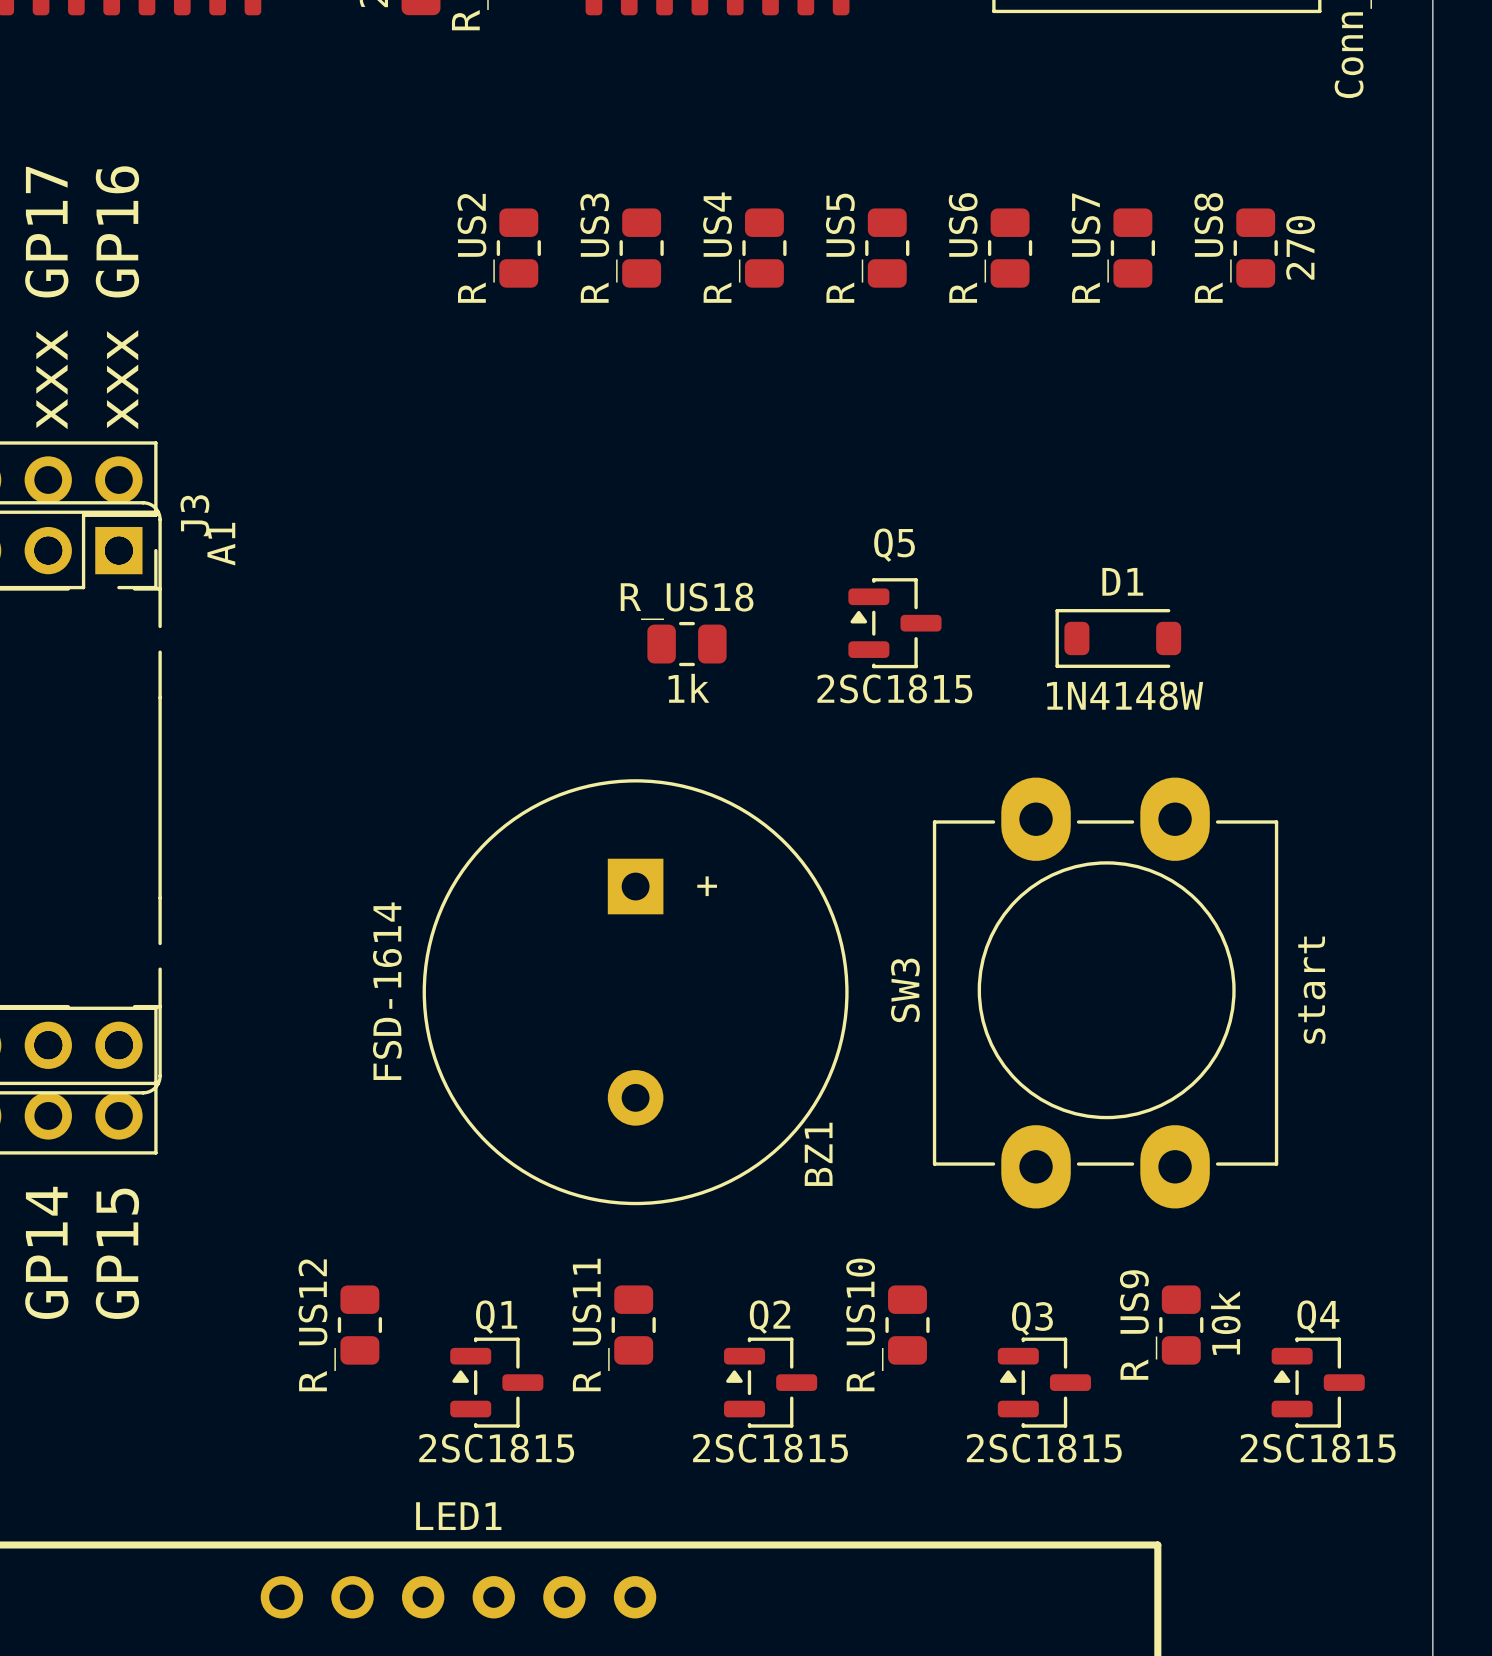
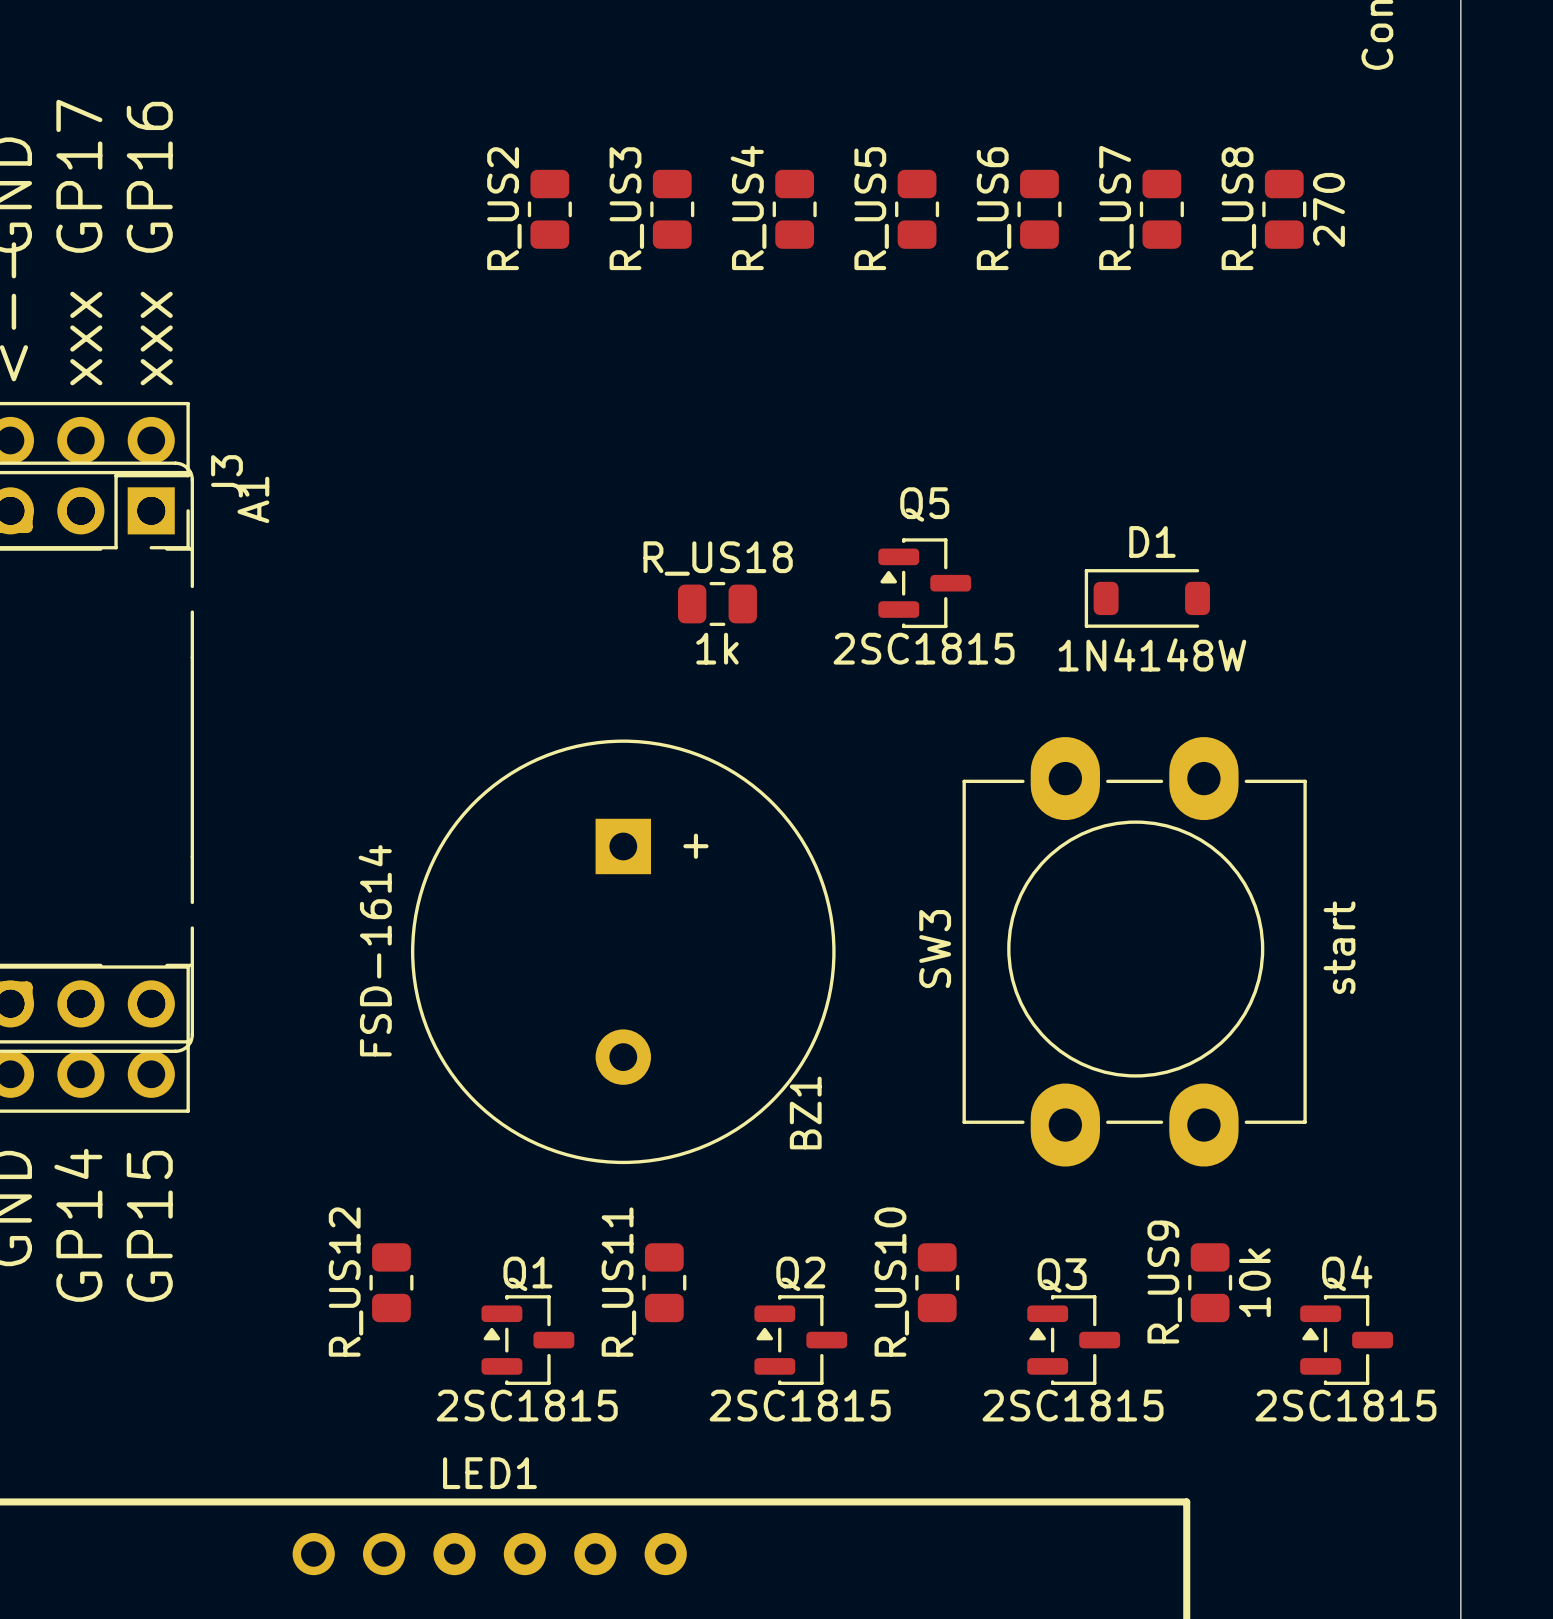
BZ1 position: (635, 992) -> (623, 951)

